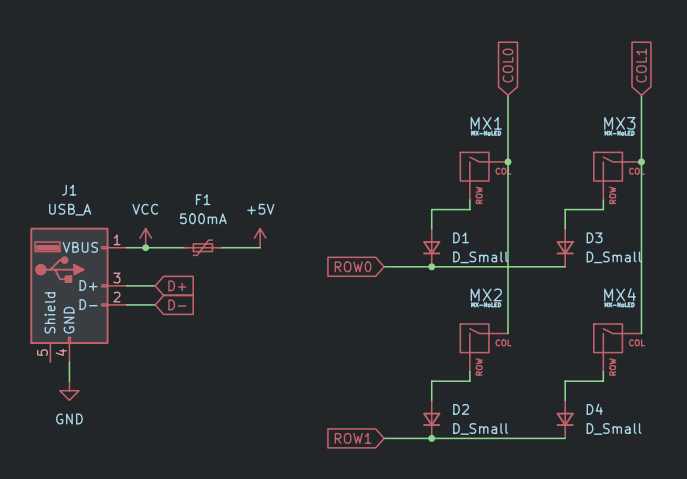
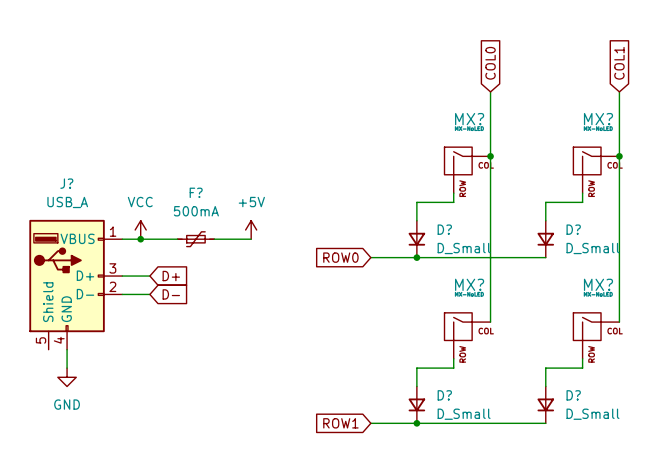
MX1 name: MX1 (486, 123) -> MX? (469, 119)
MX3 name: MX3 (619, 123) -> MX? (598, 119)
J1 name: J1 (69, 190) -> J? (66, 183)
F1 name: F1 (203, 199) -> F? (196, 192)
D1 name: D1 (461, 237) -> D? (444, 229)
D3 name: D3 (594, 237) -> D? (573, 229)
MX2 name: MX2 (486, 294) -> MX? (469, 284)
MX4 name: MX4 (620, 294) -> MX? (598, 284)
D2 name: D2 (461, 409) -> D? (444, 395)
D4 name: D4 (594, 409) -> D? (573, 395)

